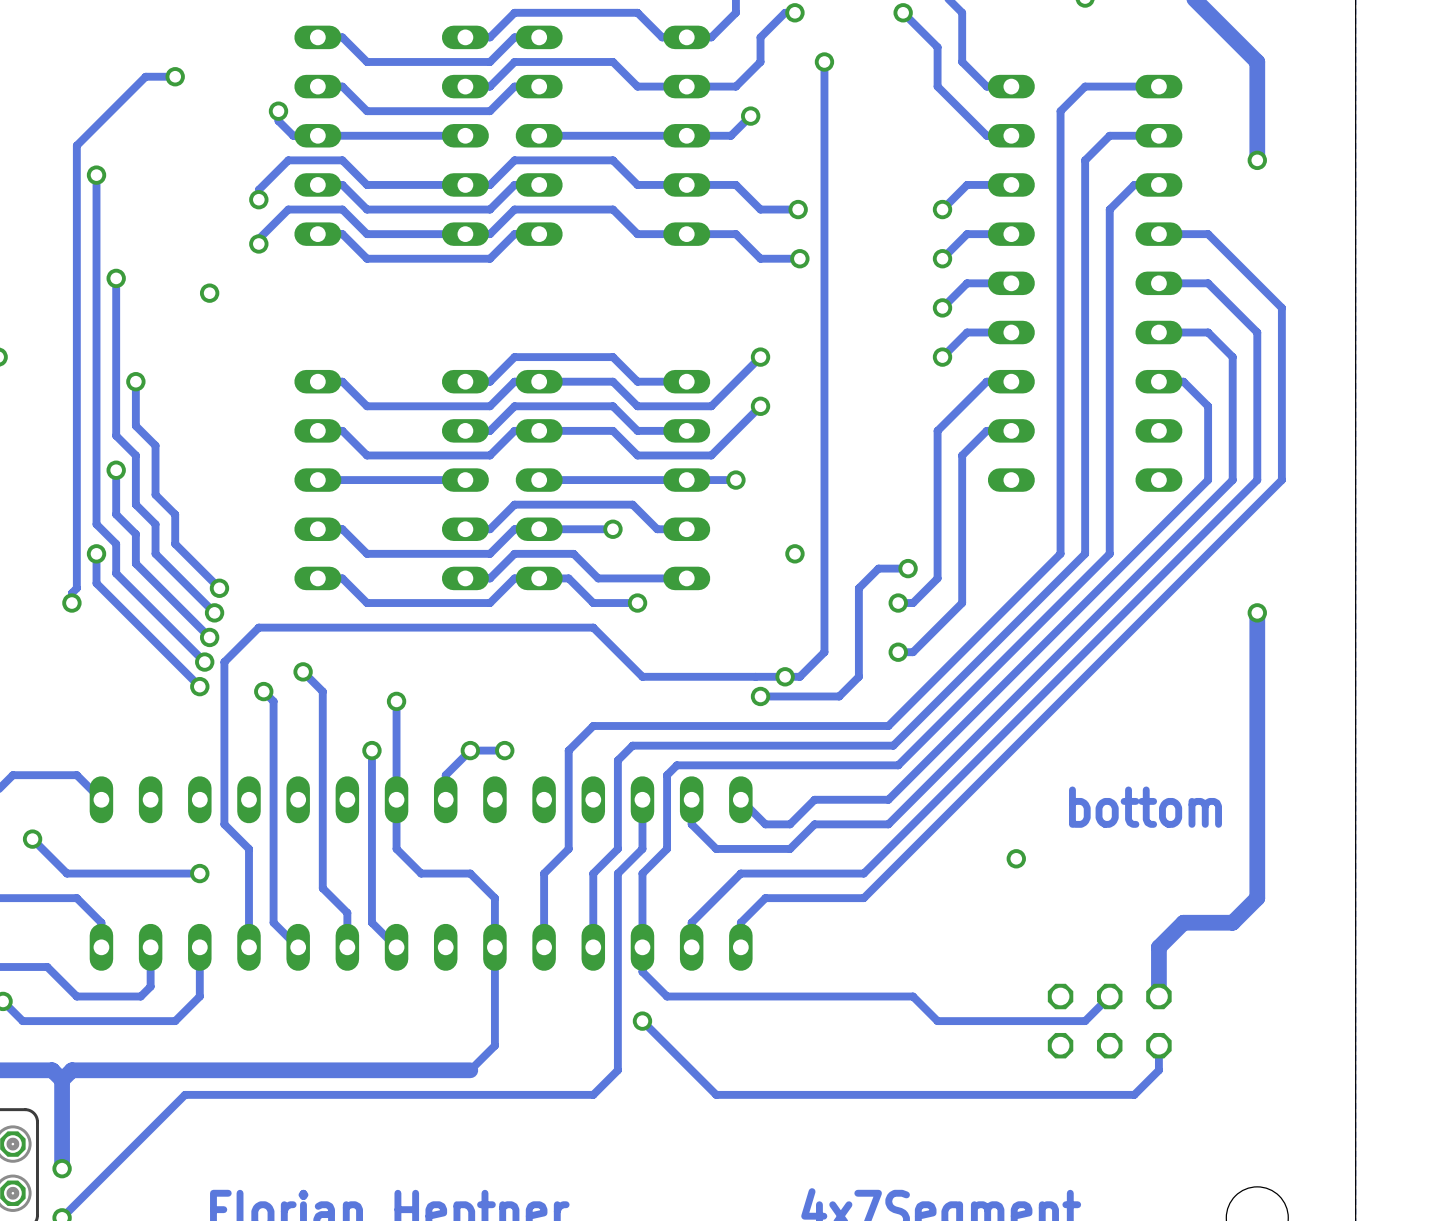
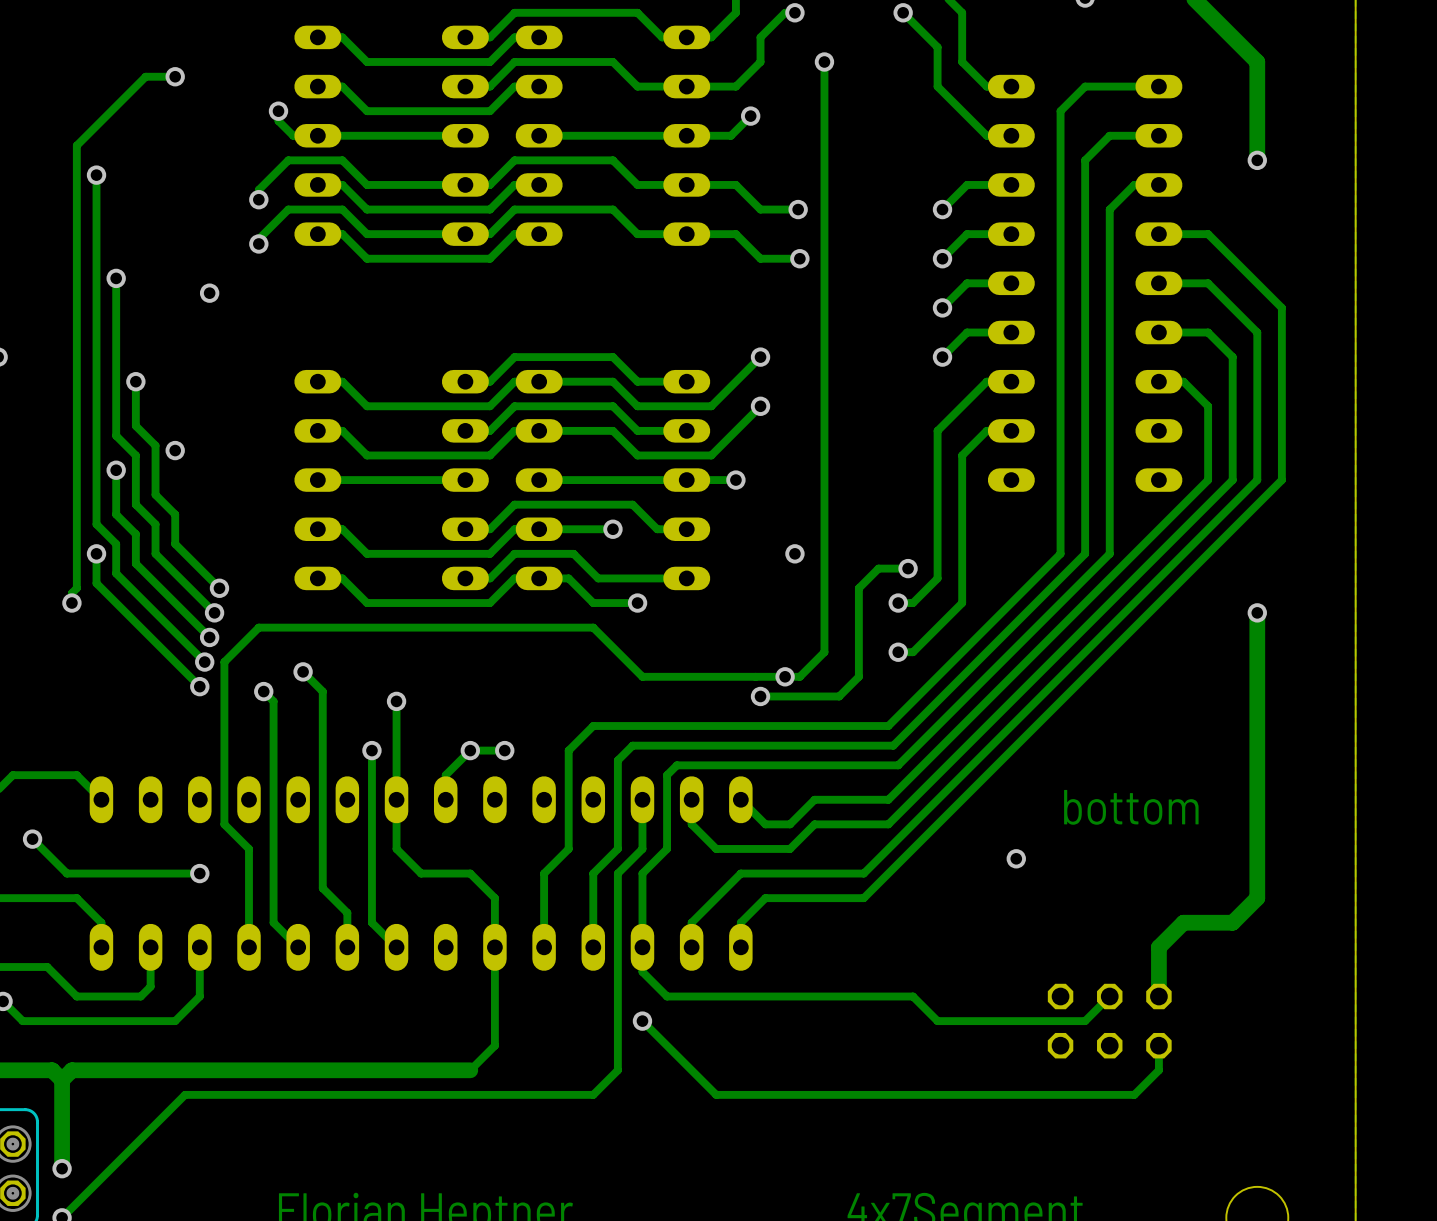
via: none -> (175, 450)

